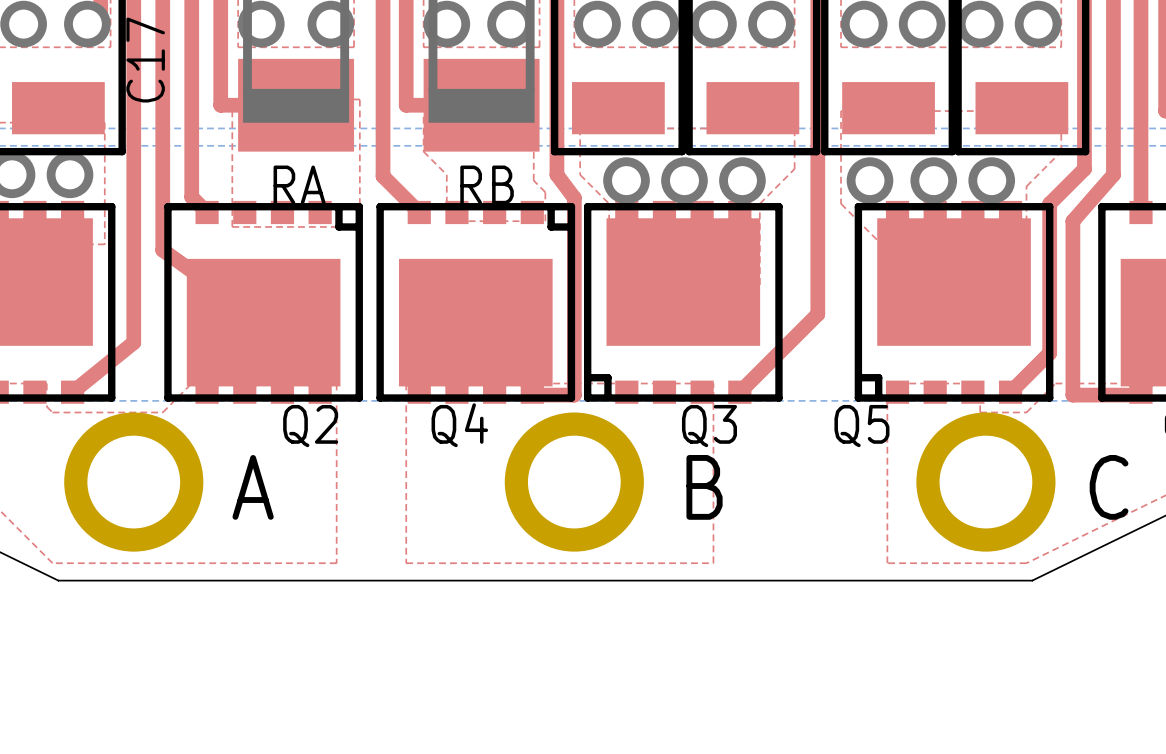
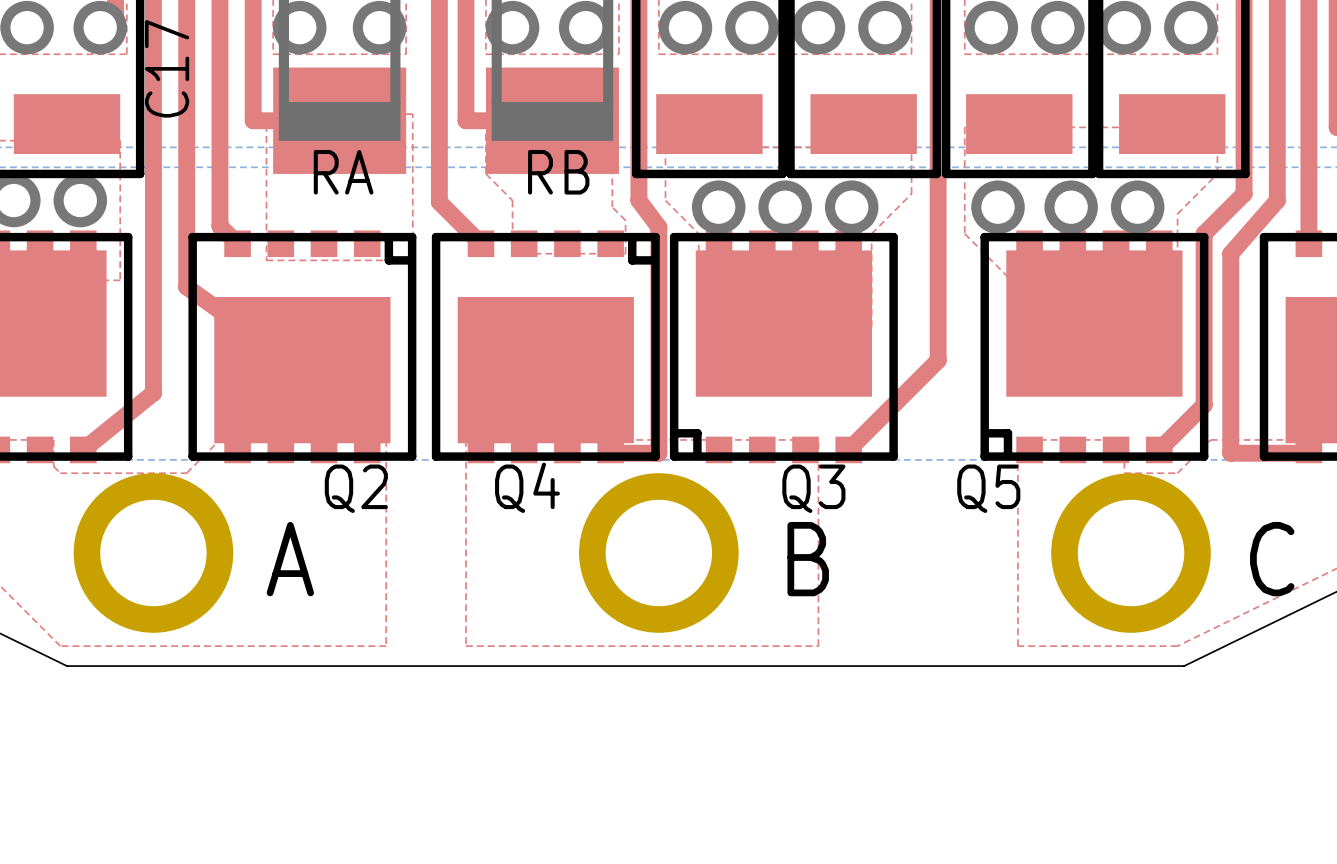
RA name position: RA (299, 184) -> RA (343, 172)
RB name position: RB (487, 184) -> RB (558, 172)

